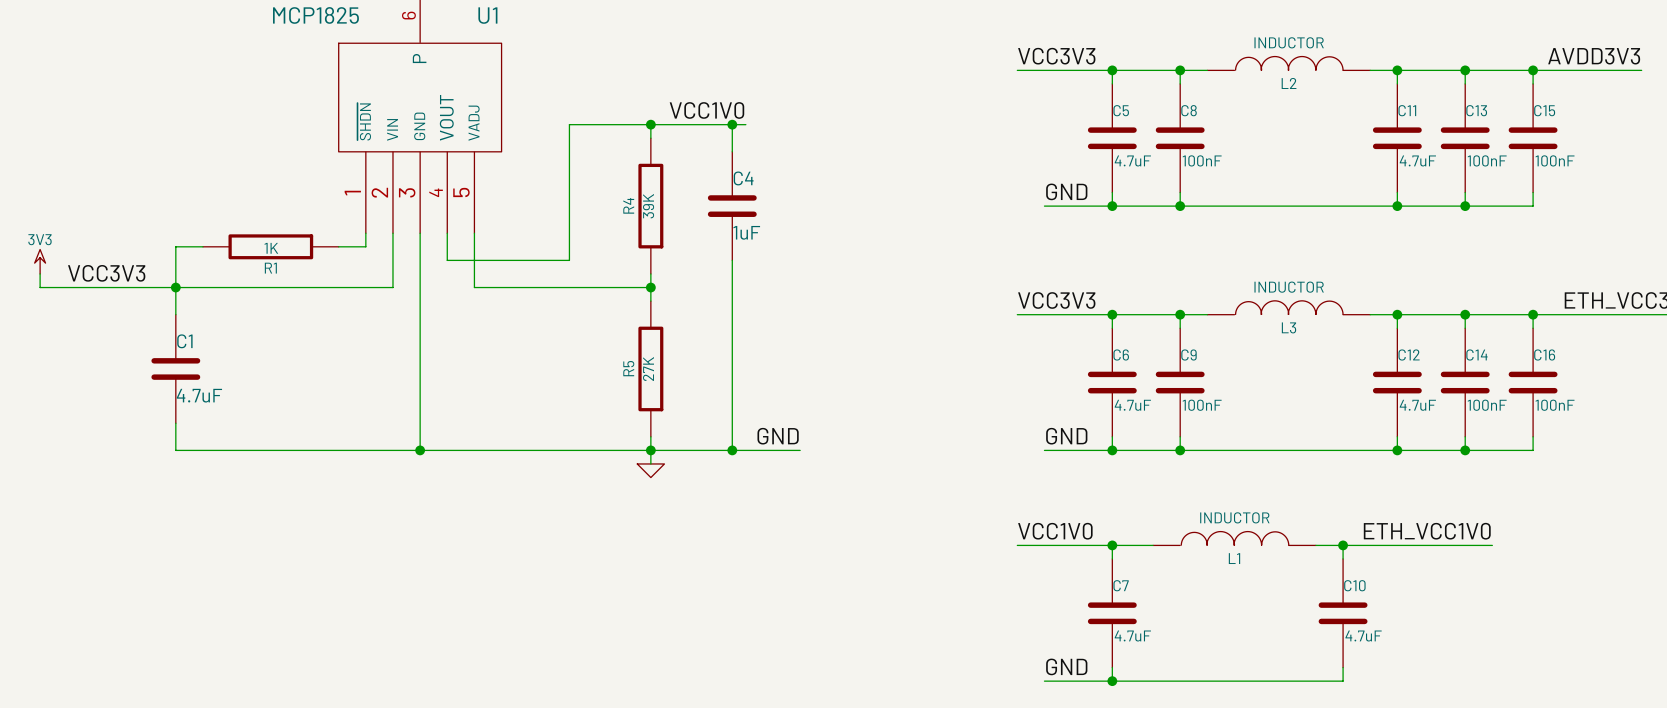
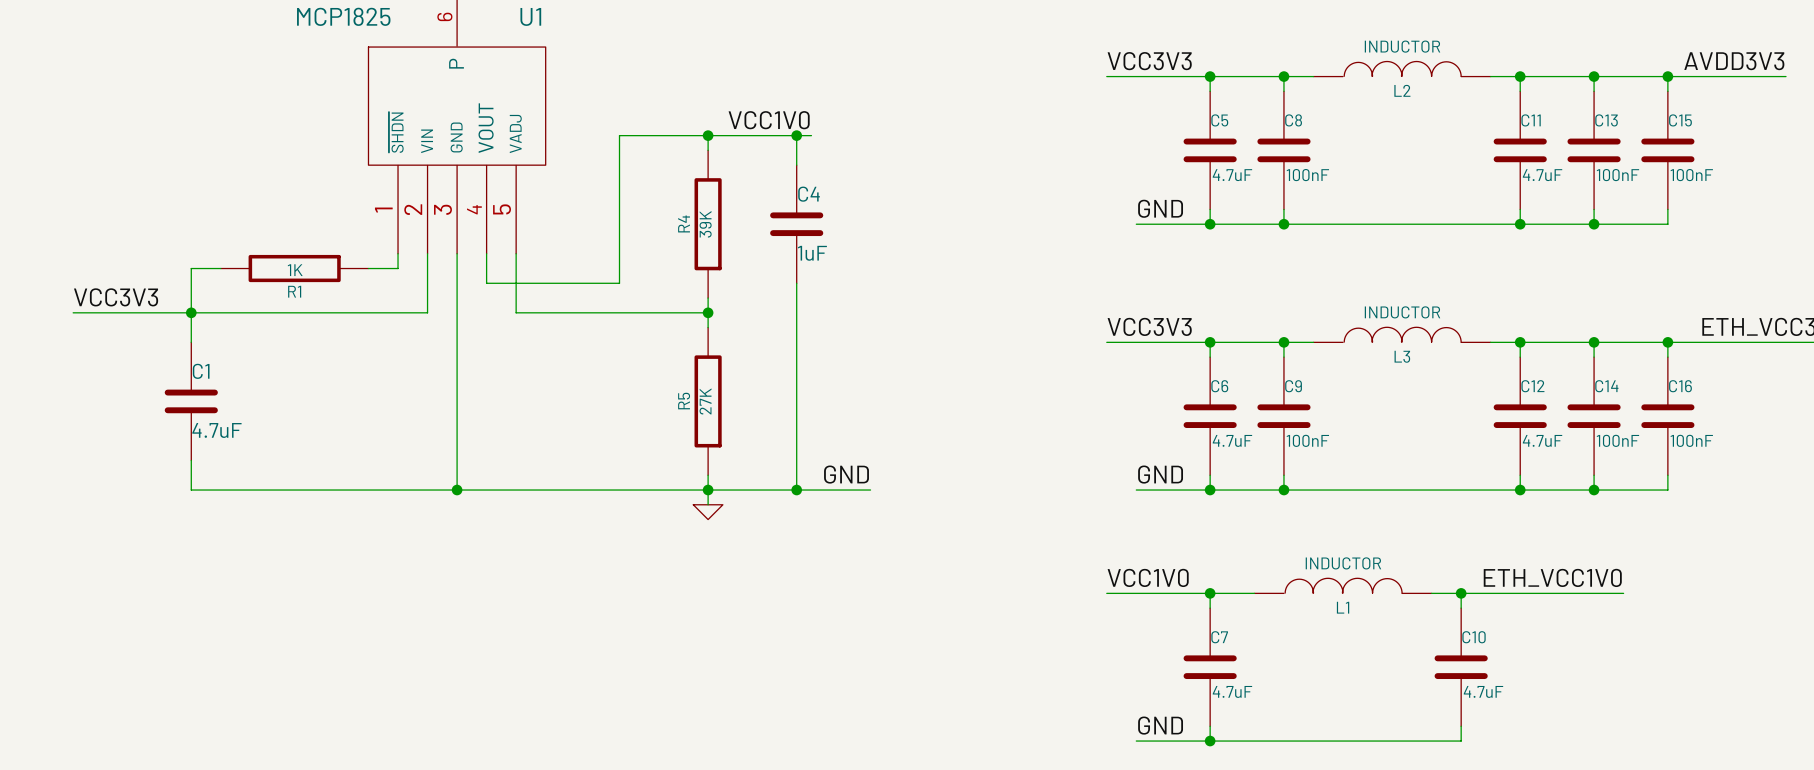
power symbol: 3V3 (40, 261) -> none
wire: (40, 273) (40, 287) (67, 287) -> none

